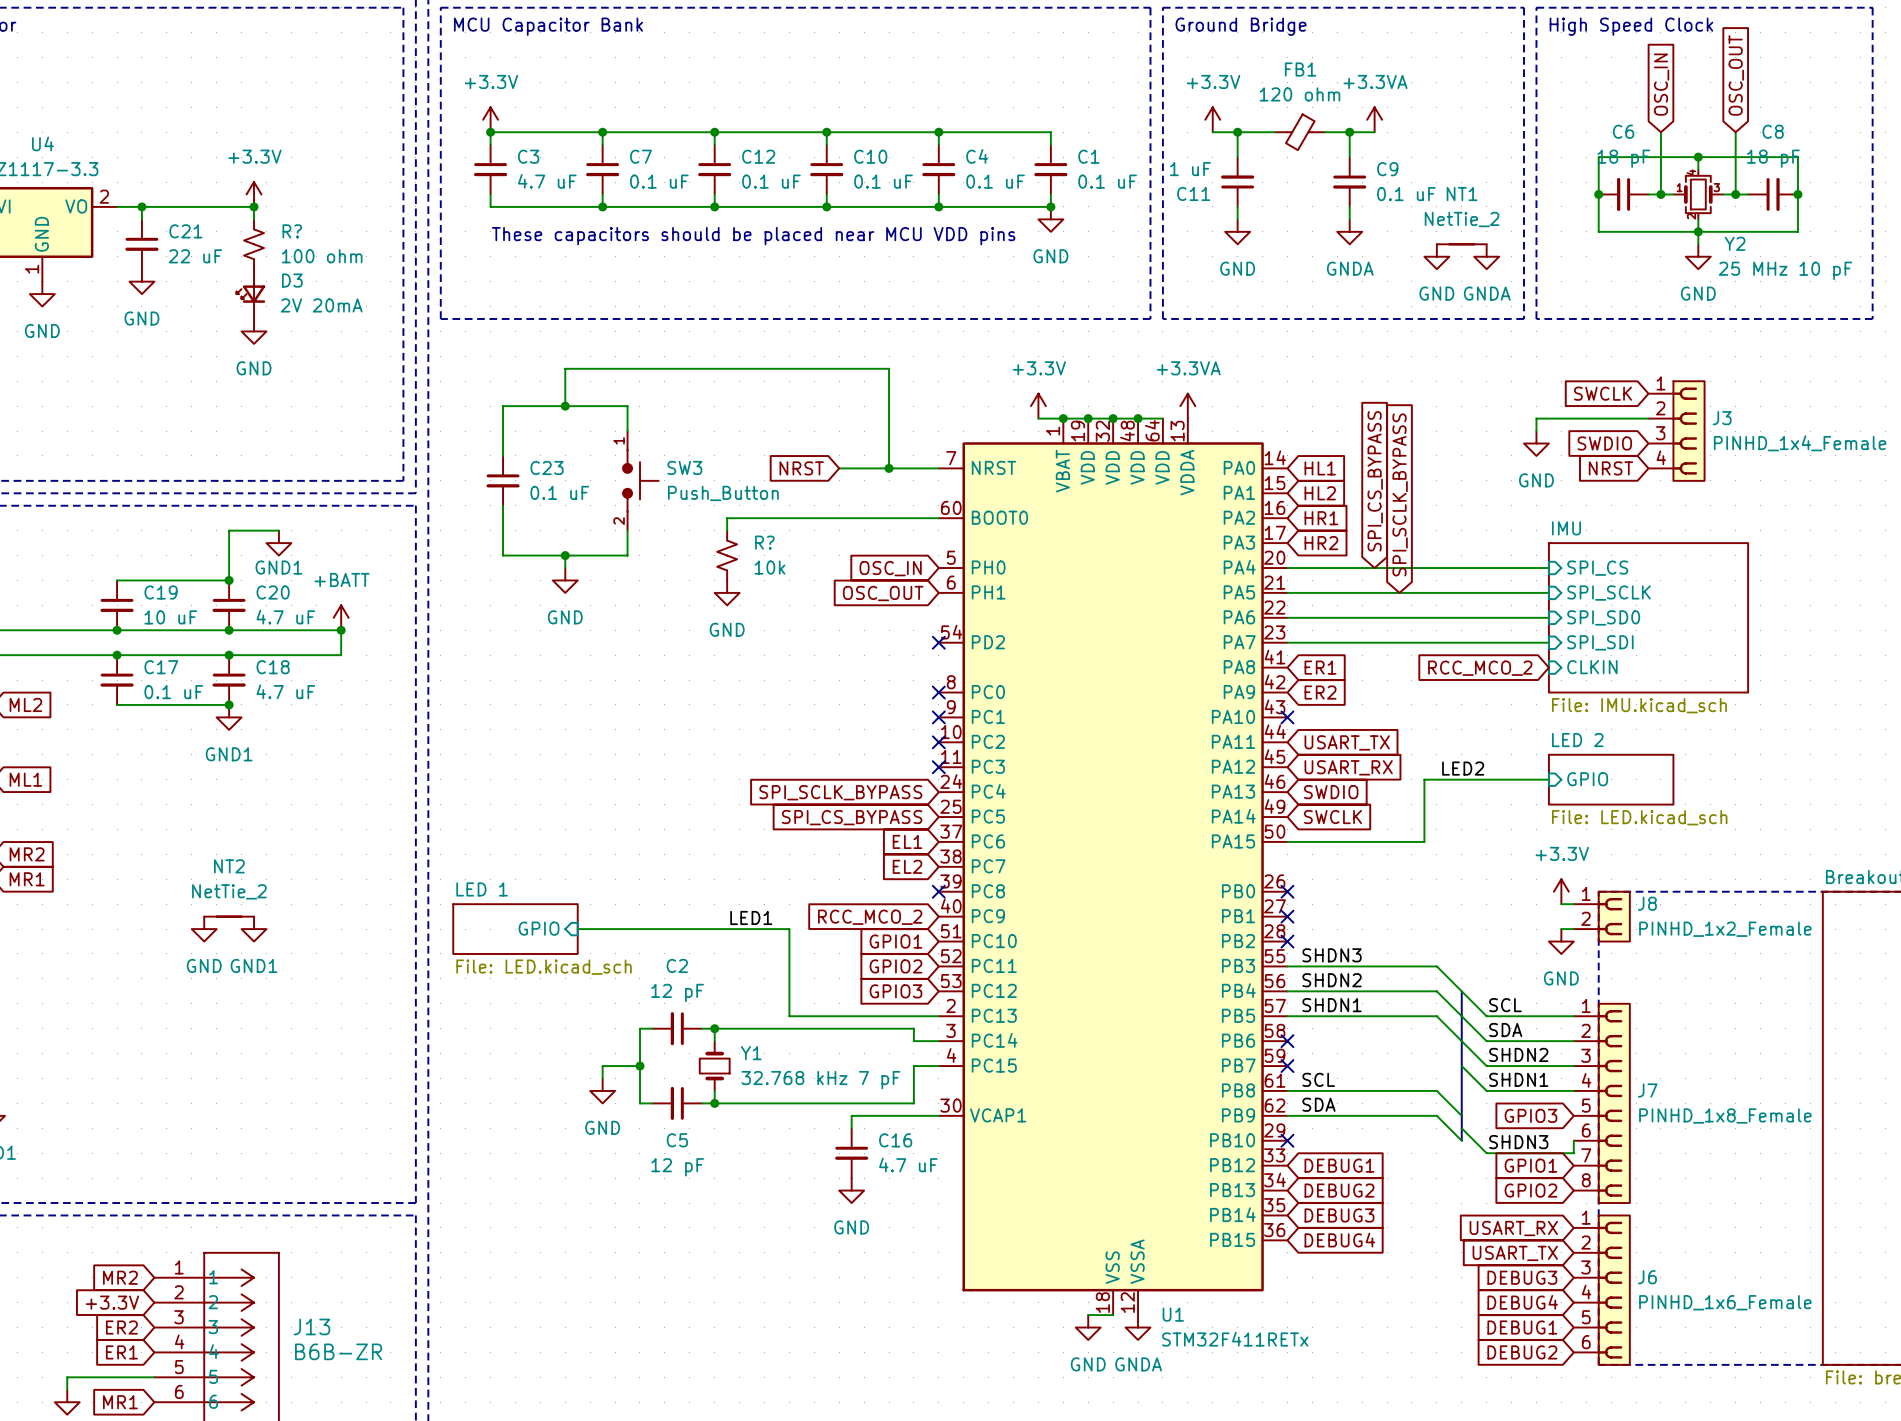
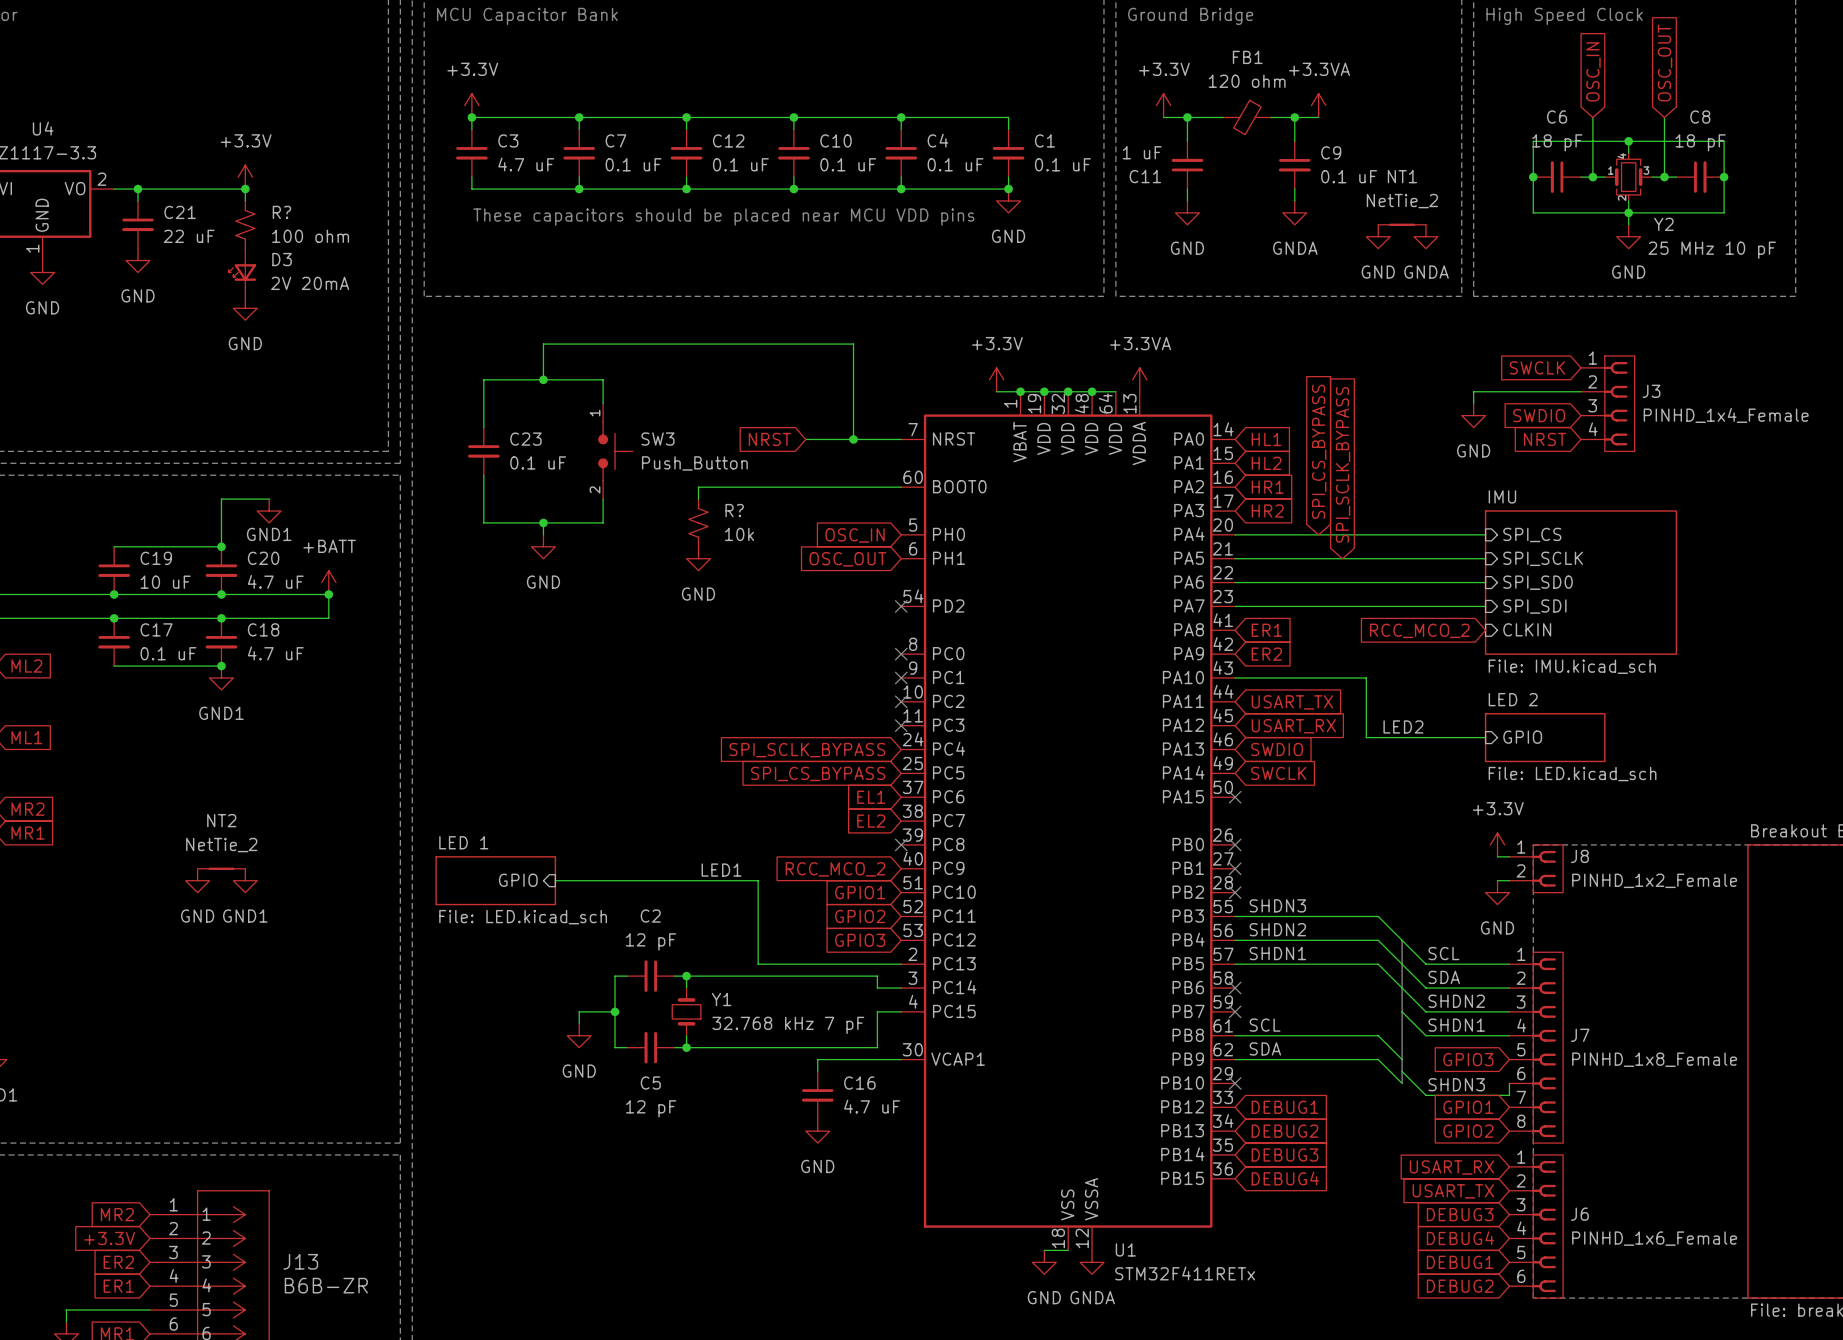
no-connect mark: (1287, 717) -> none
wire: (1424, 779) (1424, 841) (1287, 841) -> (1366, 737) (1366, 677) (1235, 677)
no-connect mark: none -> (1235, 797)

